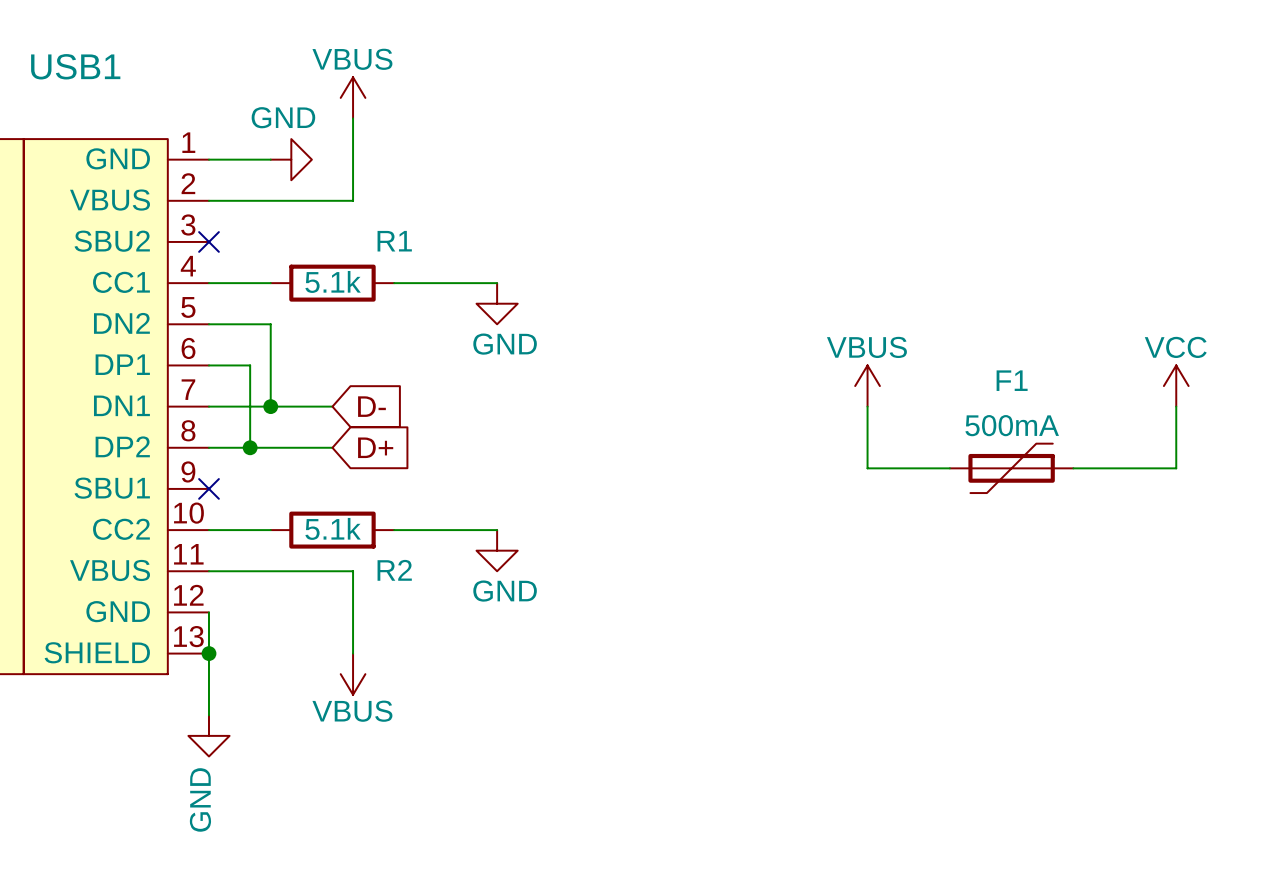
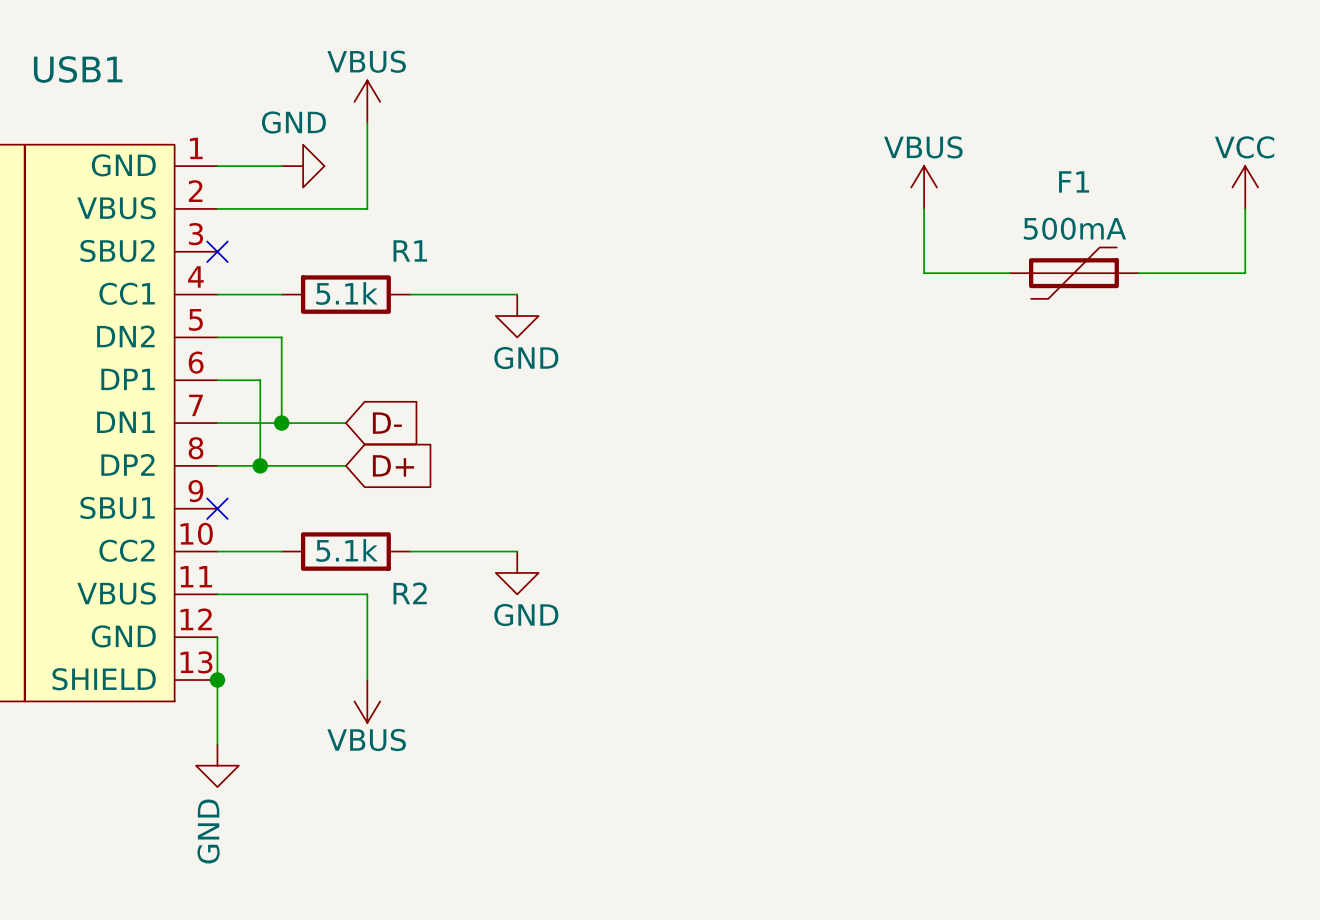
power symbol position: VBUS (867, 386) -> VBUS (924, 187)
power symbol position: VCC (1176, 386) -> VCC (1245, 187)
wire: (867, 406) (867, 468) (949, 468) -> (924, 208) (924, 273) (1009, 273)
wire: (1176, 406) (1176, 468) (1073, 468) -> (1245, 208) (1245, 273) (1138, 273)
F1 position: (1011, 468) -> (1073, 273)

